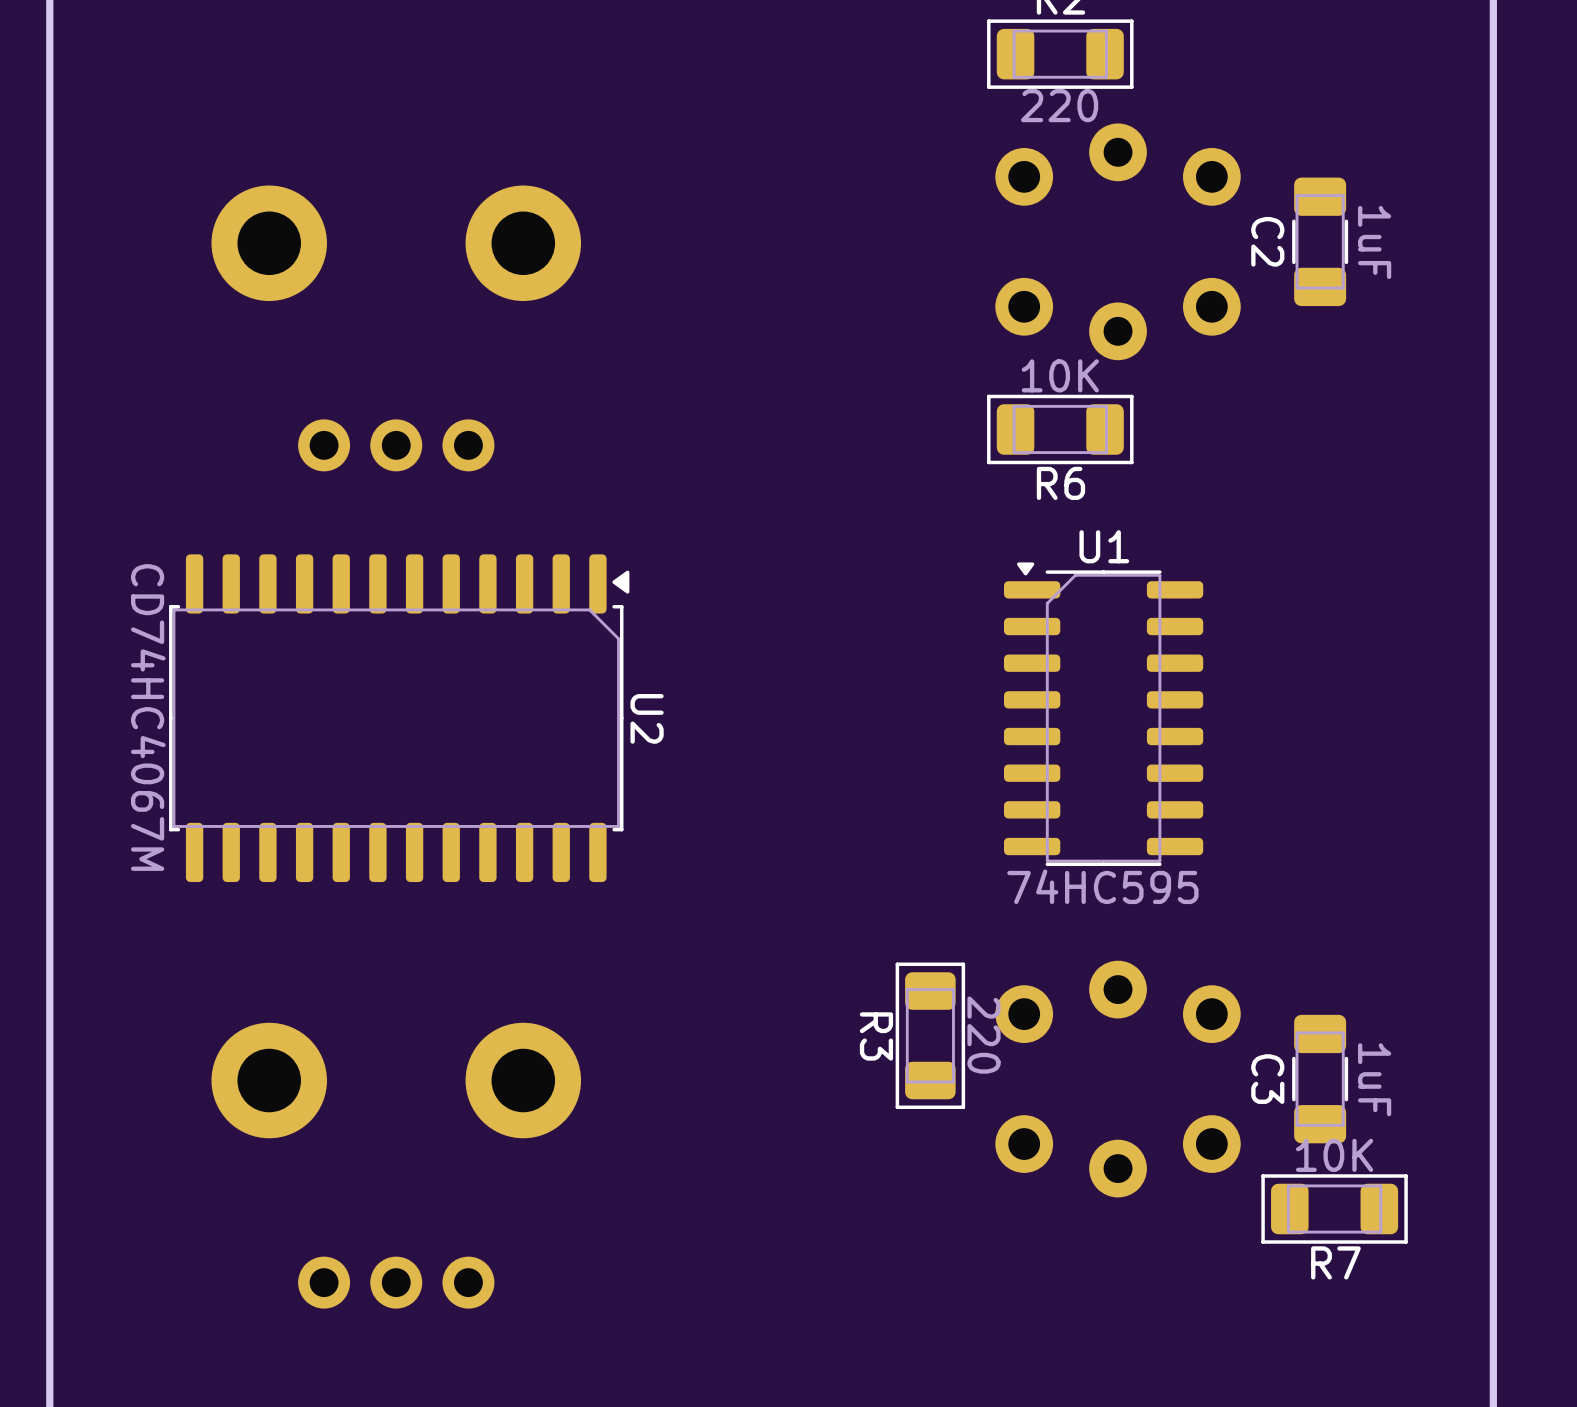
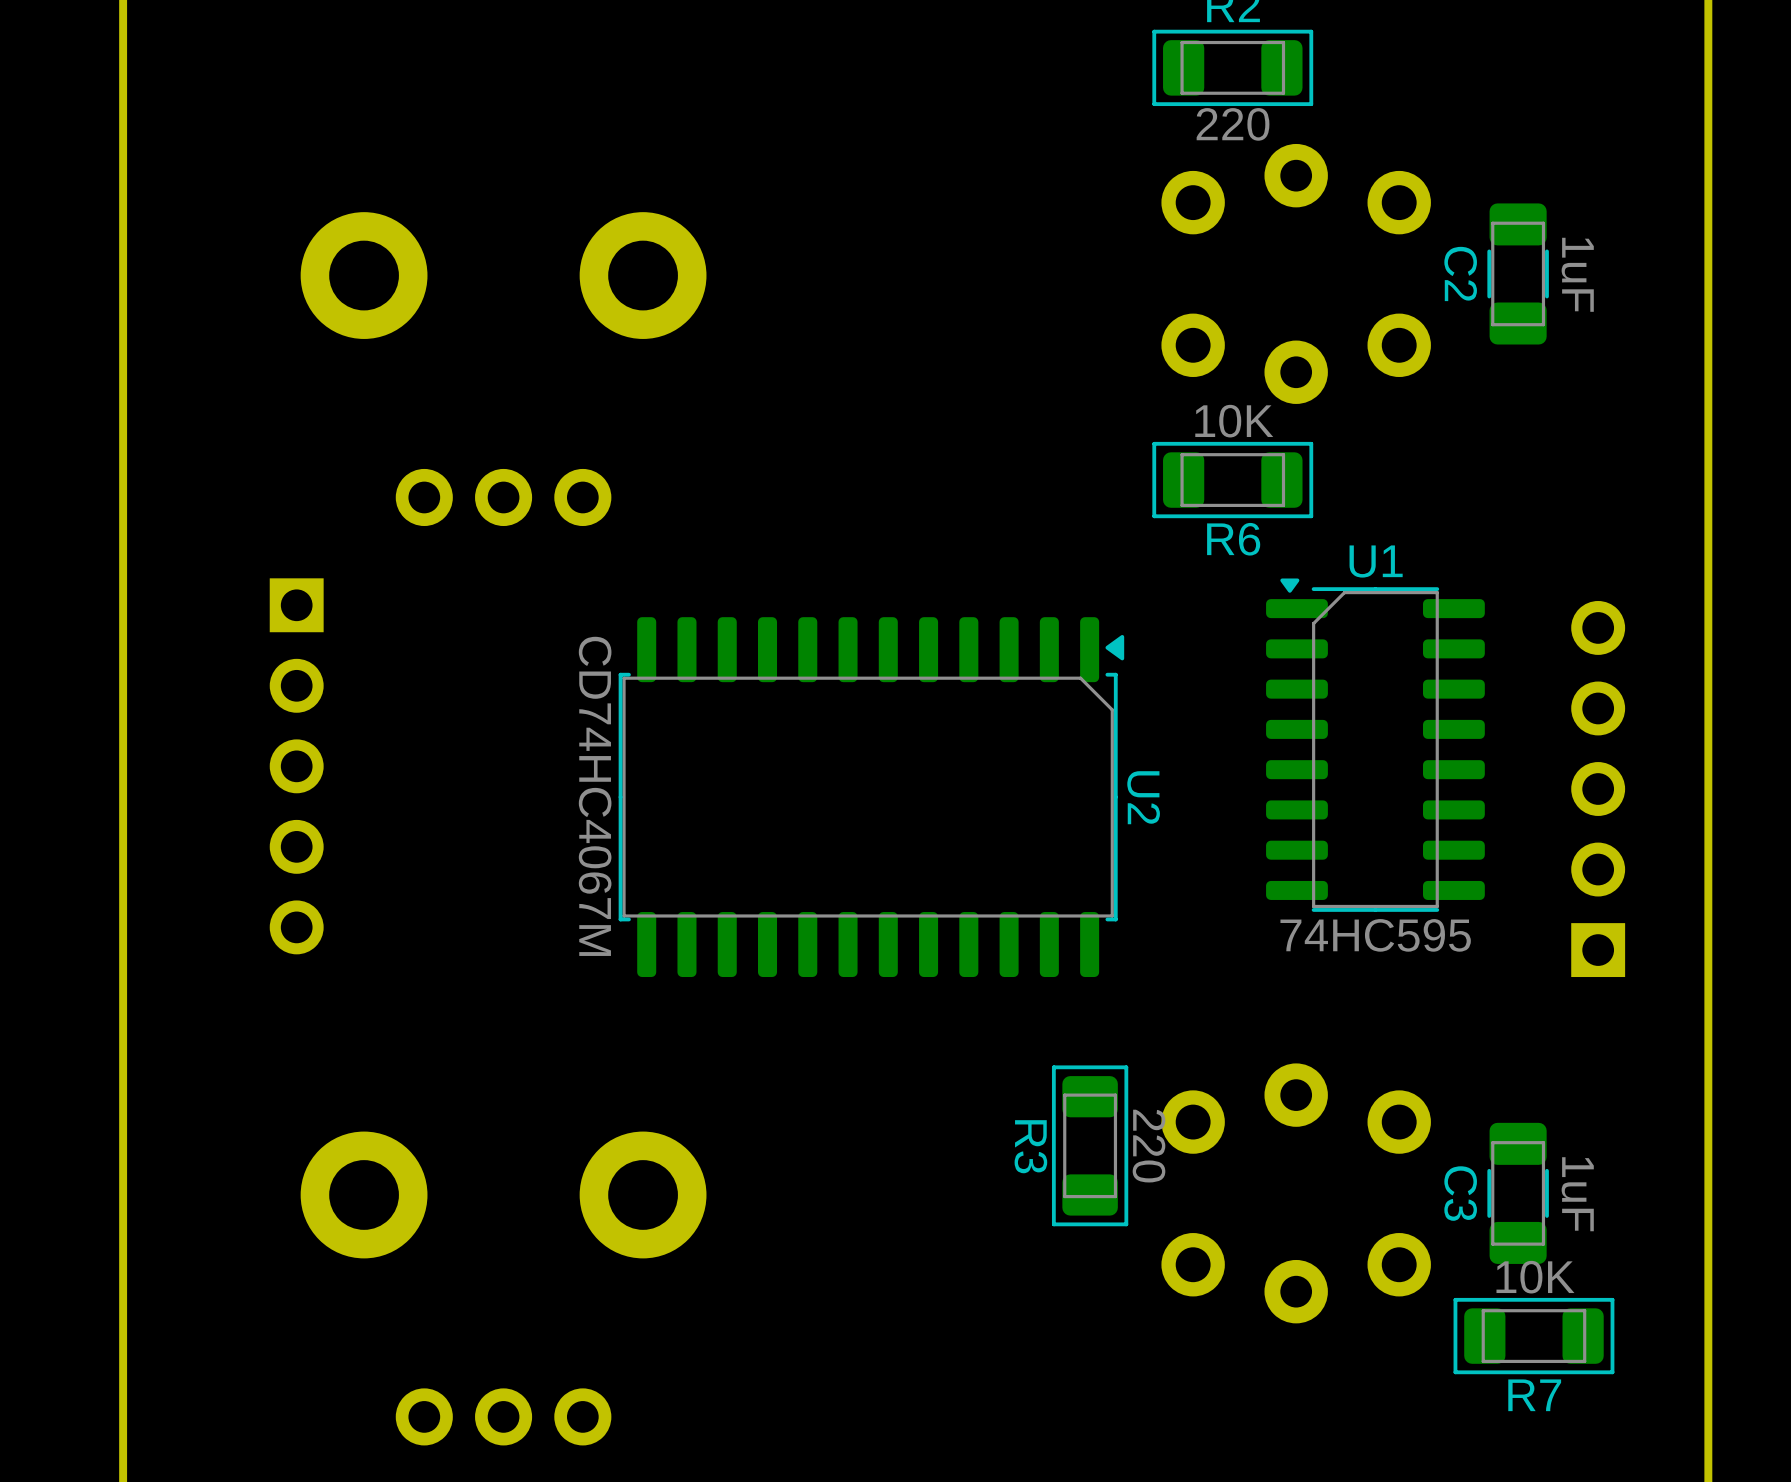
part: none -> (296, 766)
part: none -> (1598, 789)
U1 position: (1103, 714) -> (1375, 745)
U2 position: (399, 718) -> (871, 797)

